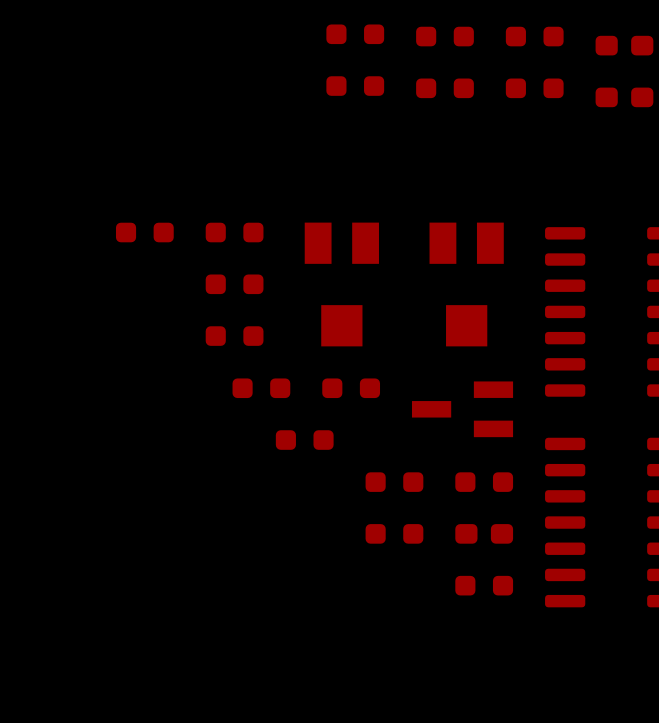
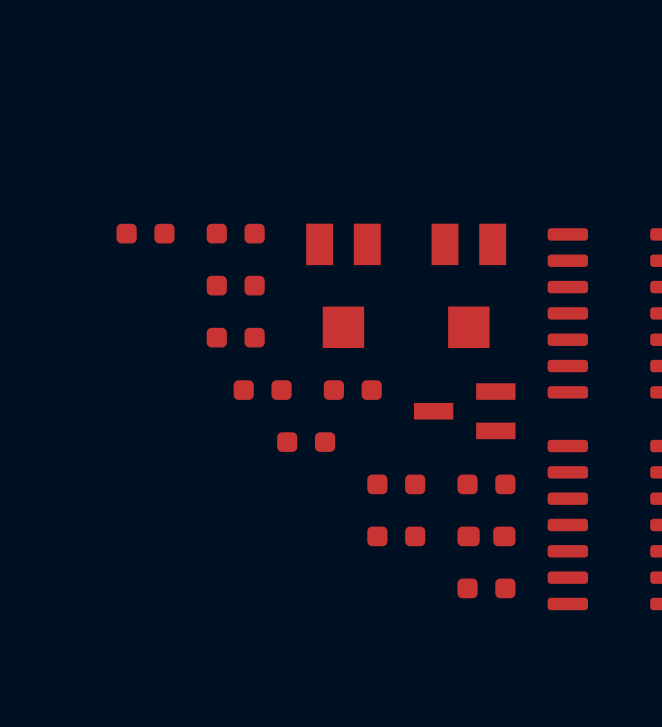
part: (355, 34) -> none
part: (444, 36) -> none
part: (534, 36) -> none
part: (624, 45) -> none
part: (355, 86) -> none
part: (444, 88) -> none
part: (534, 88) -> none
part: (624, 97) -> none

